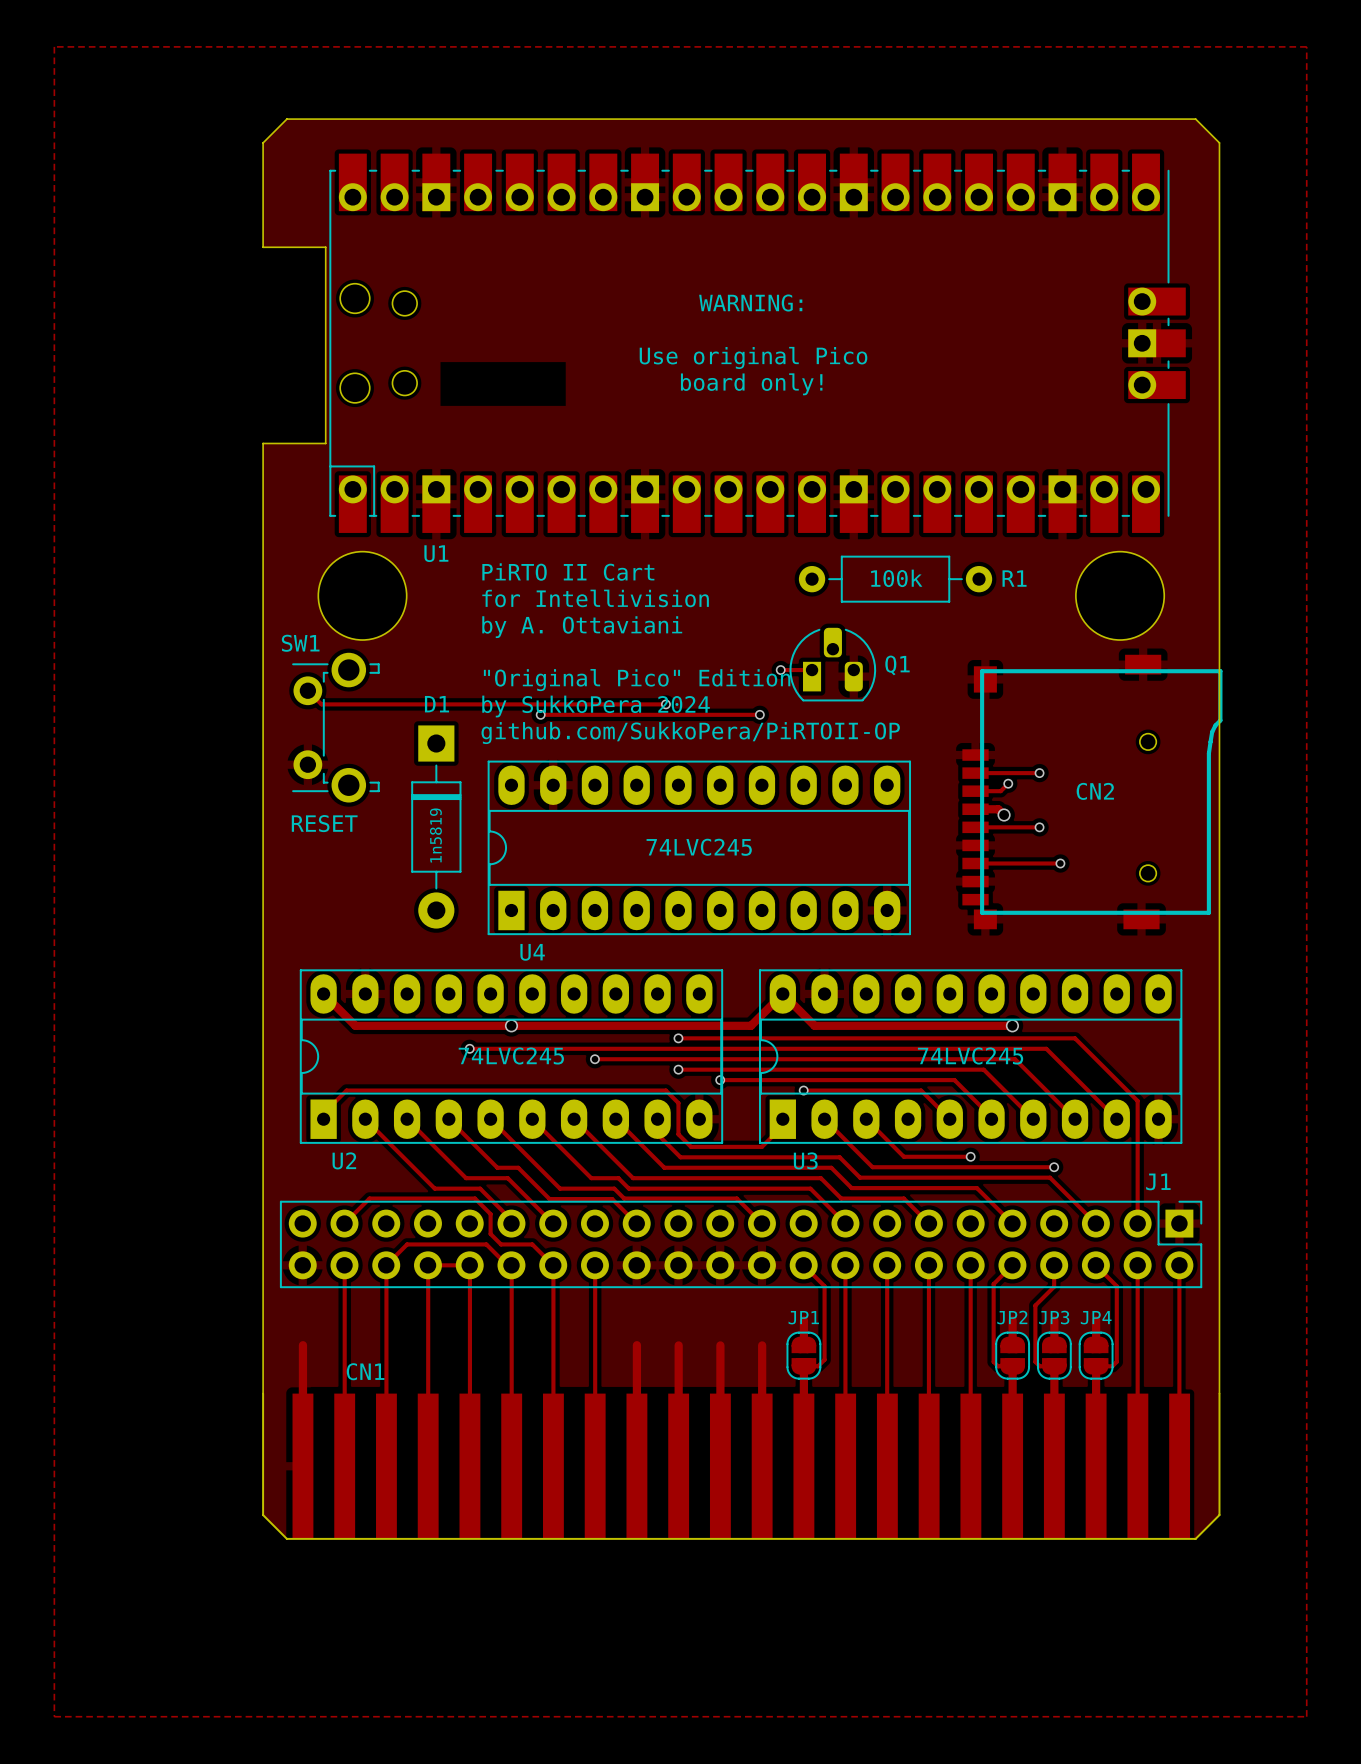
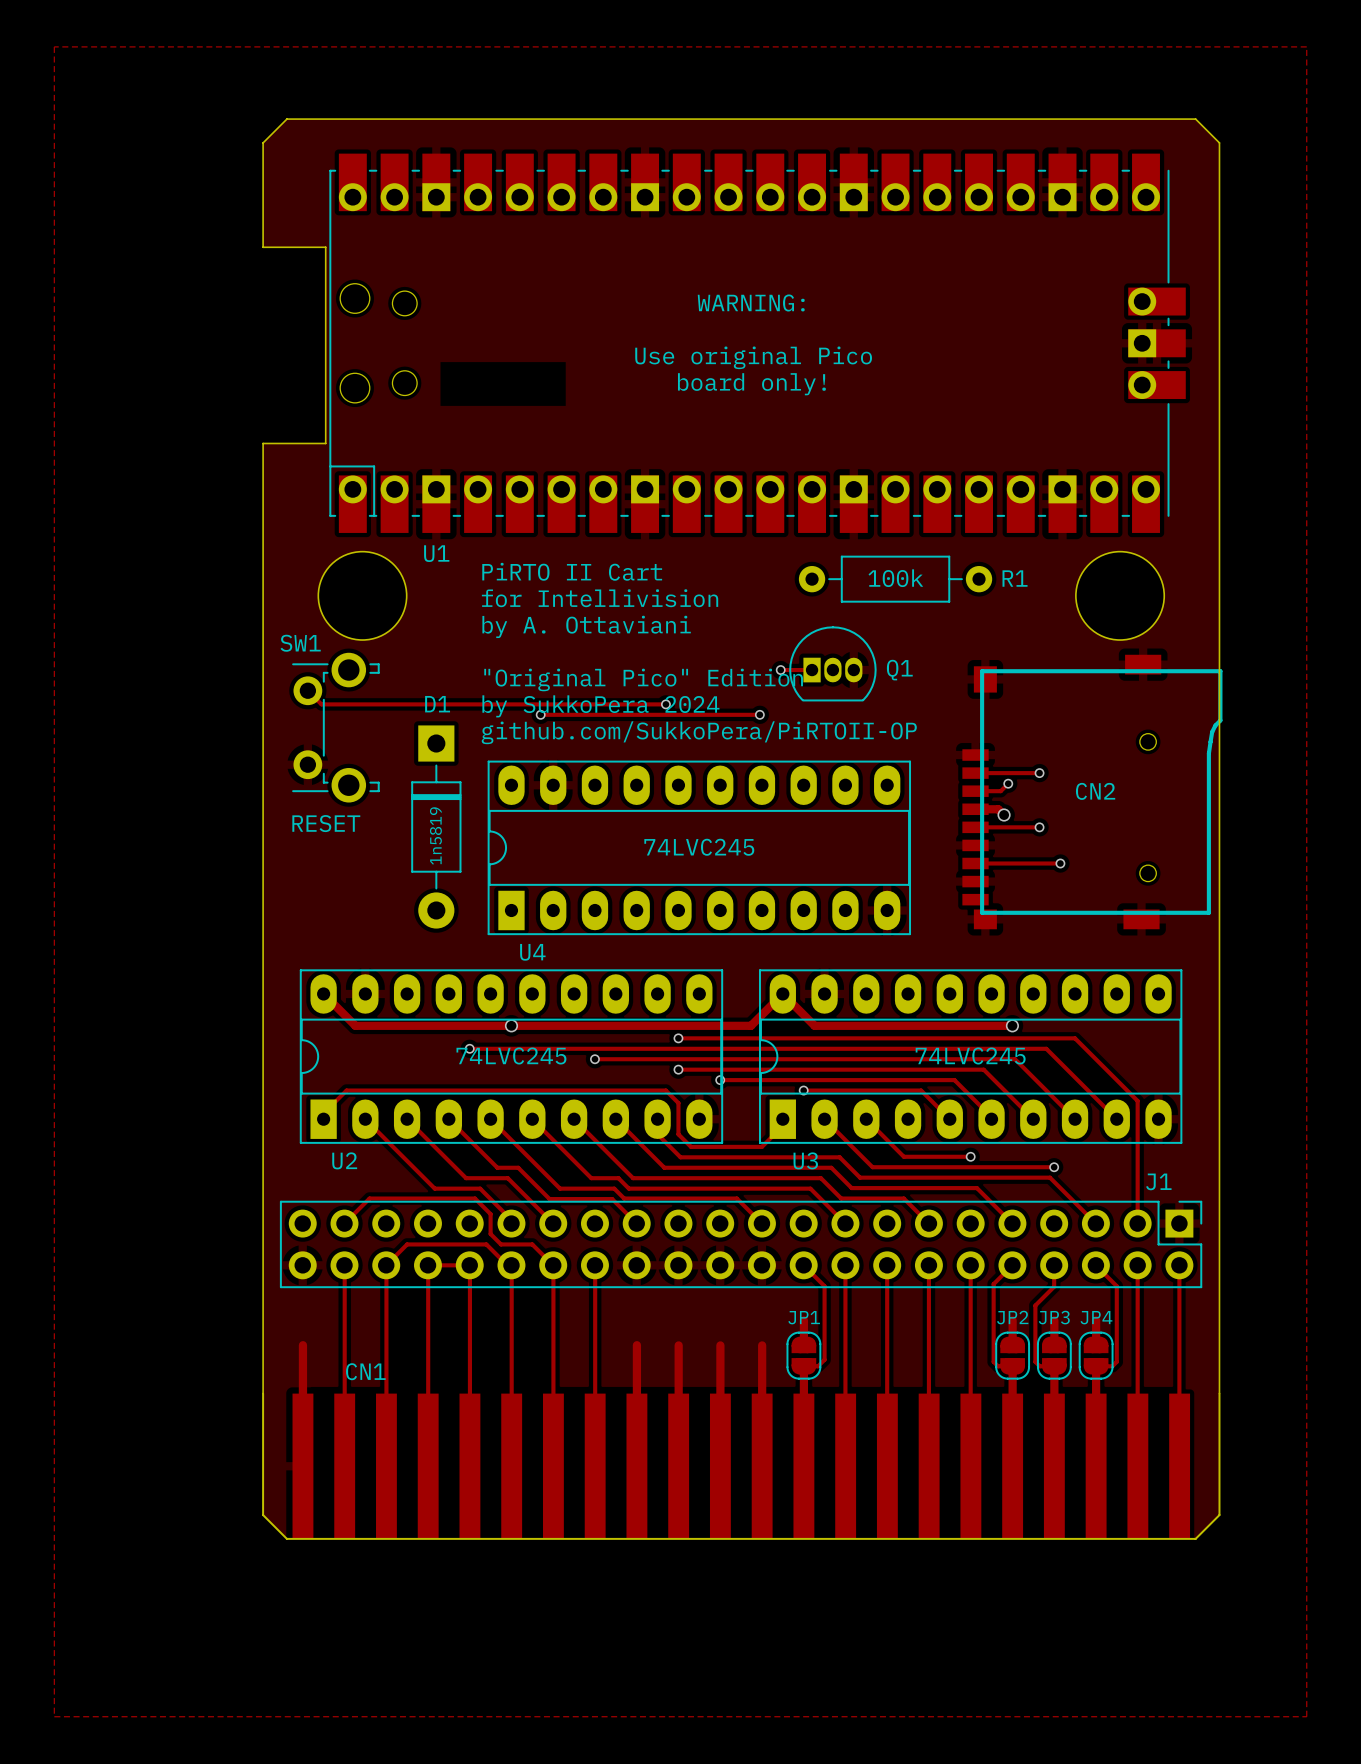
Q1 footprint: [789, 627, 877, 702] -> [789, 626, 877, 702]

